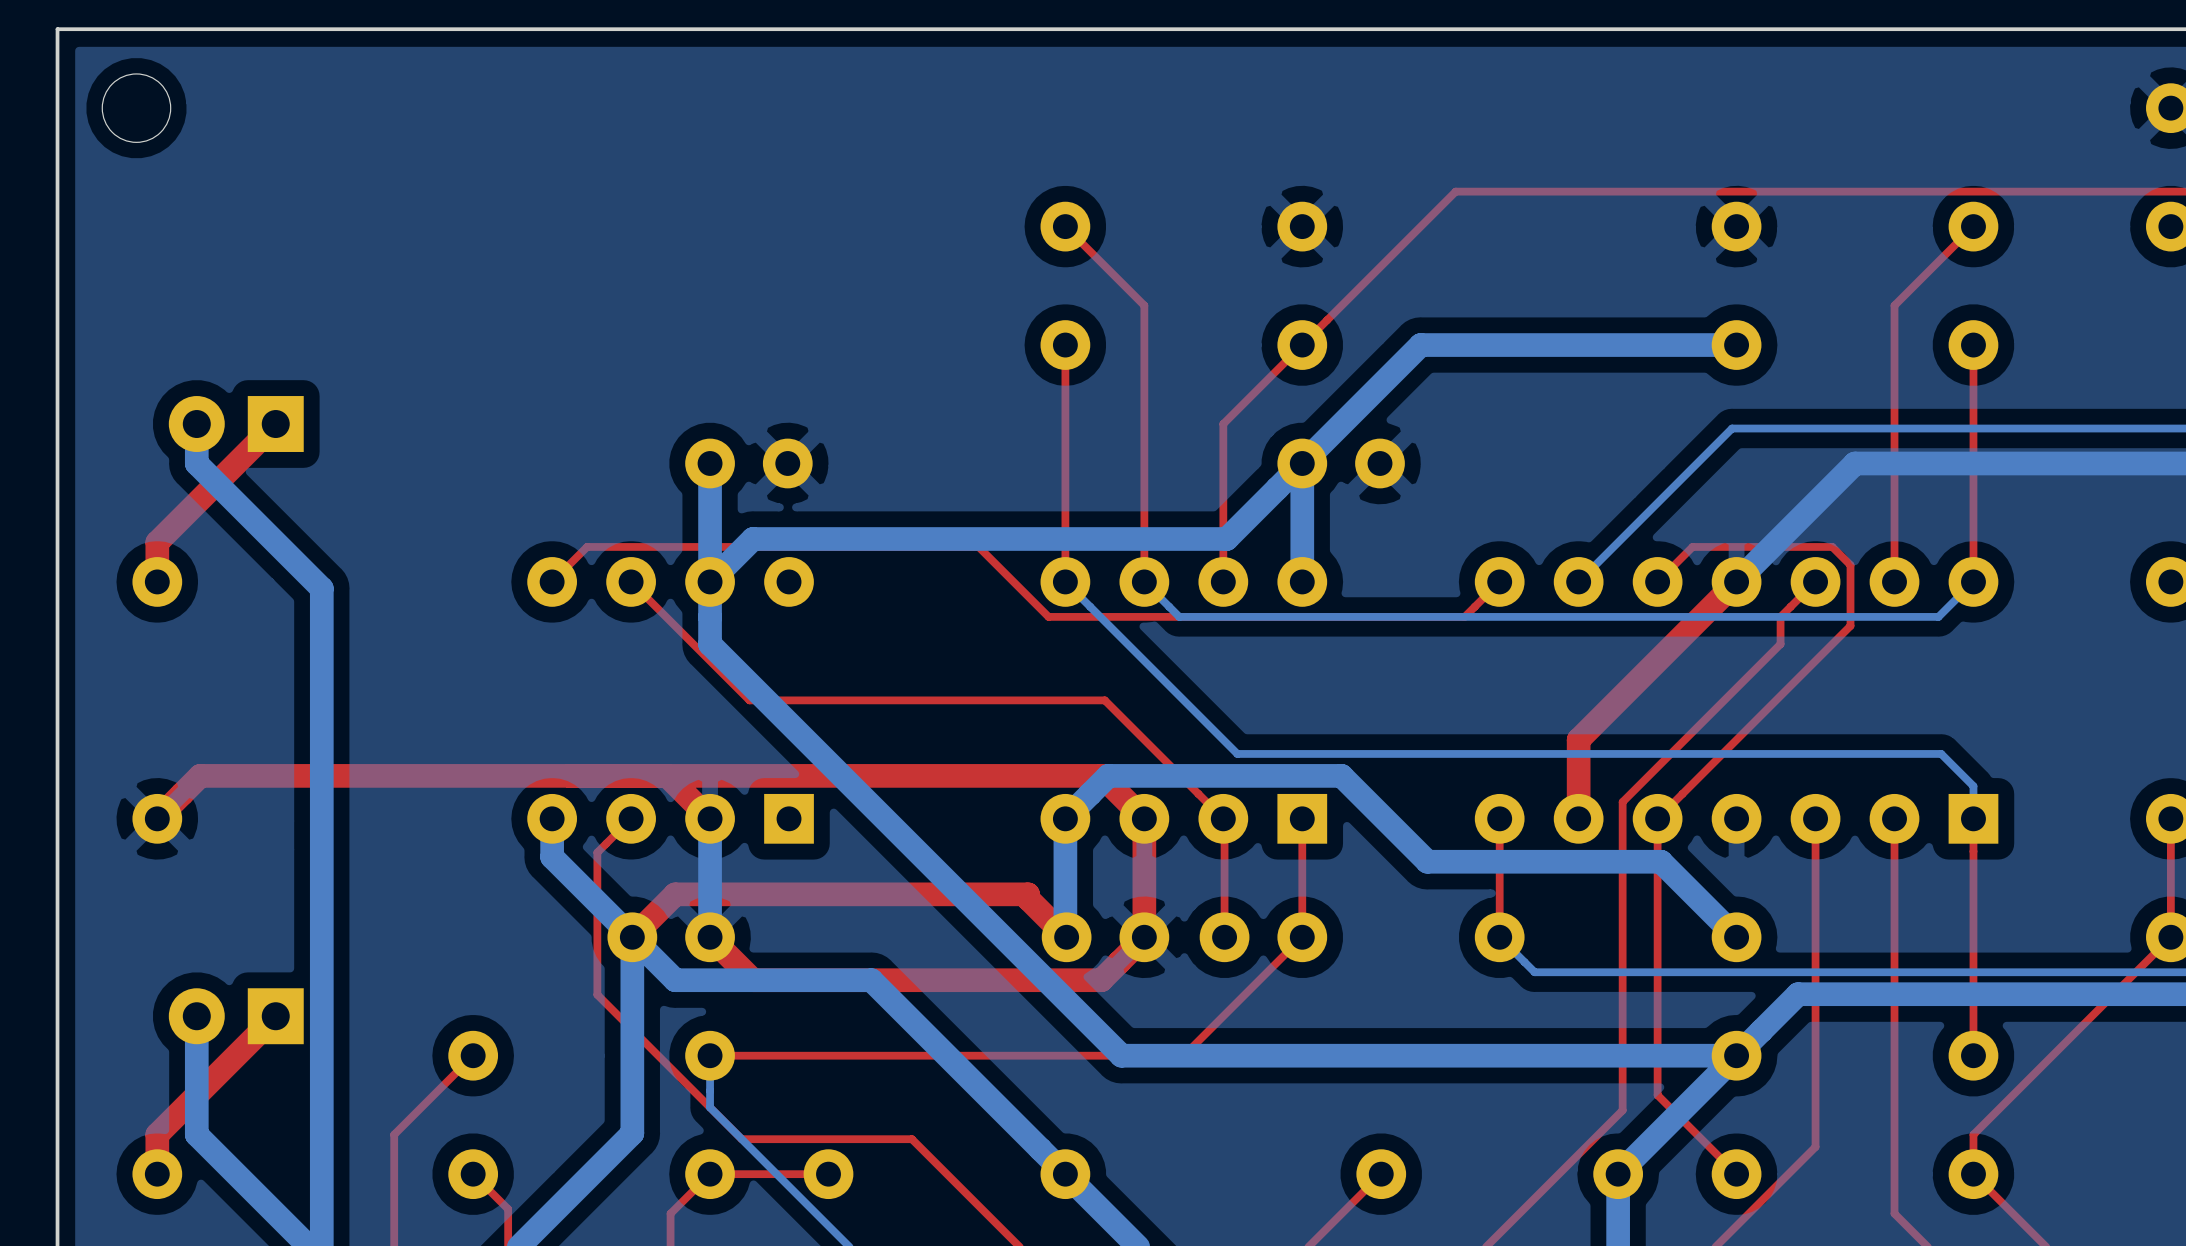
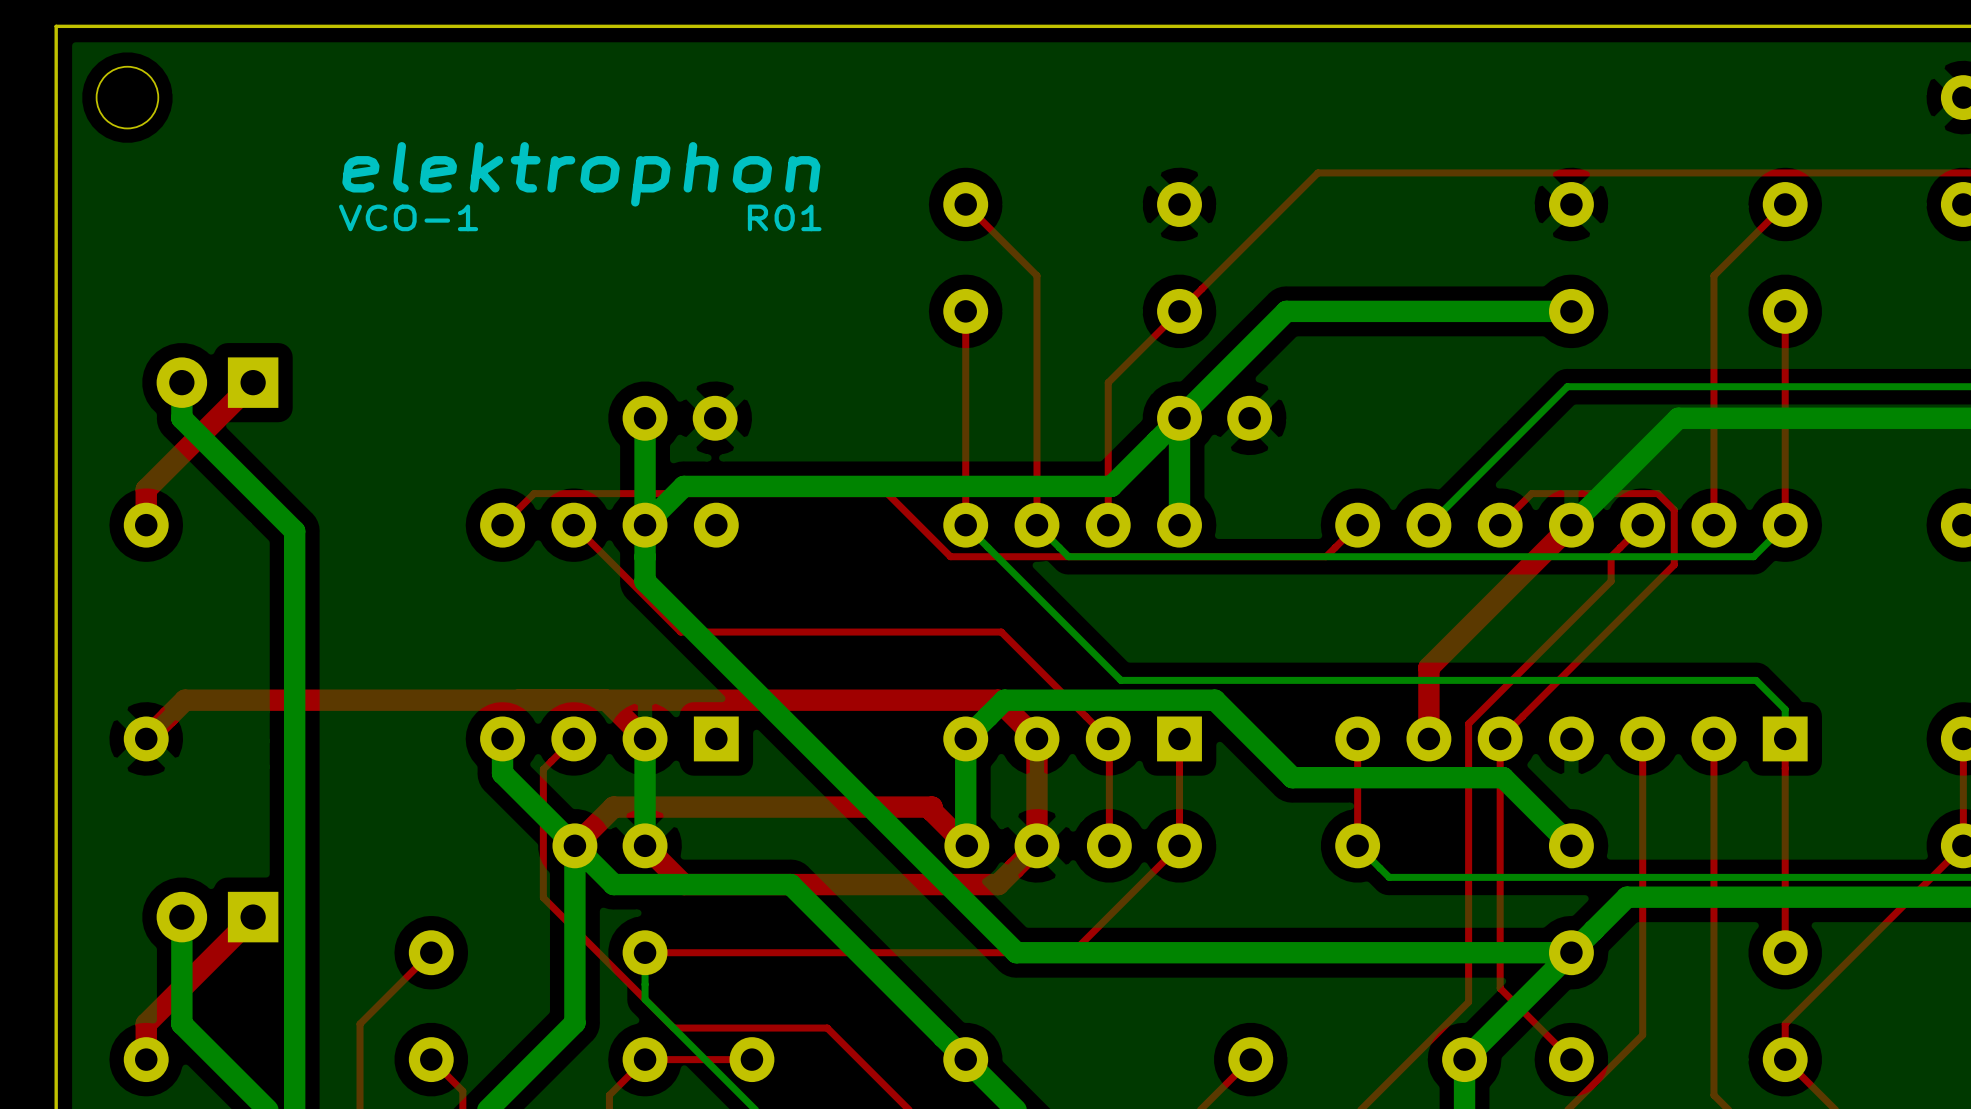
text: none -> elektrophon (581, 174)
text: none -> VCO-1 (408, 217)
text: none -> R01 (784, 217)

